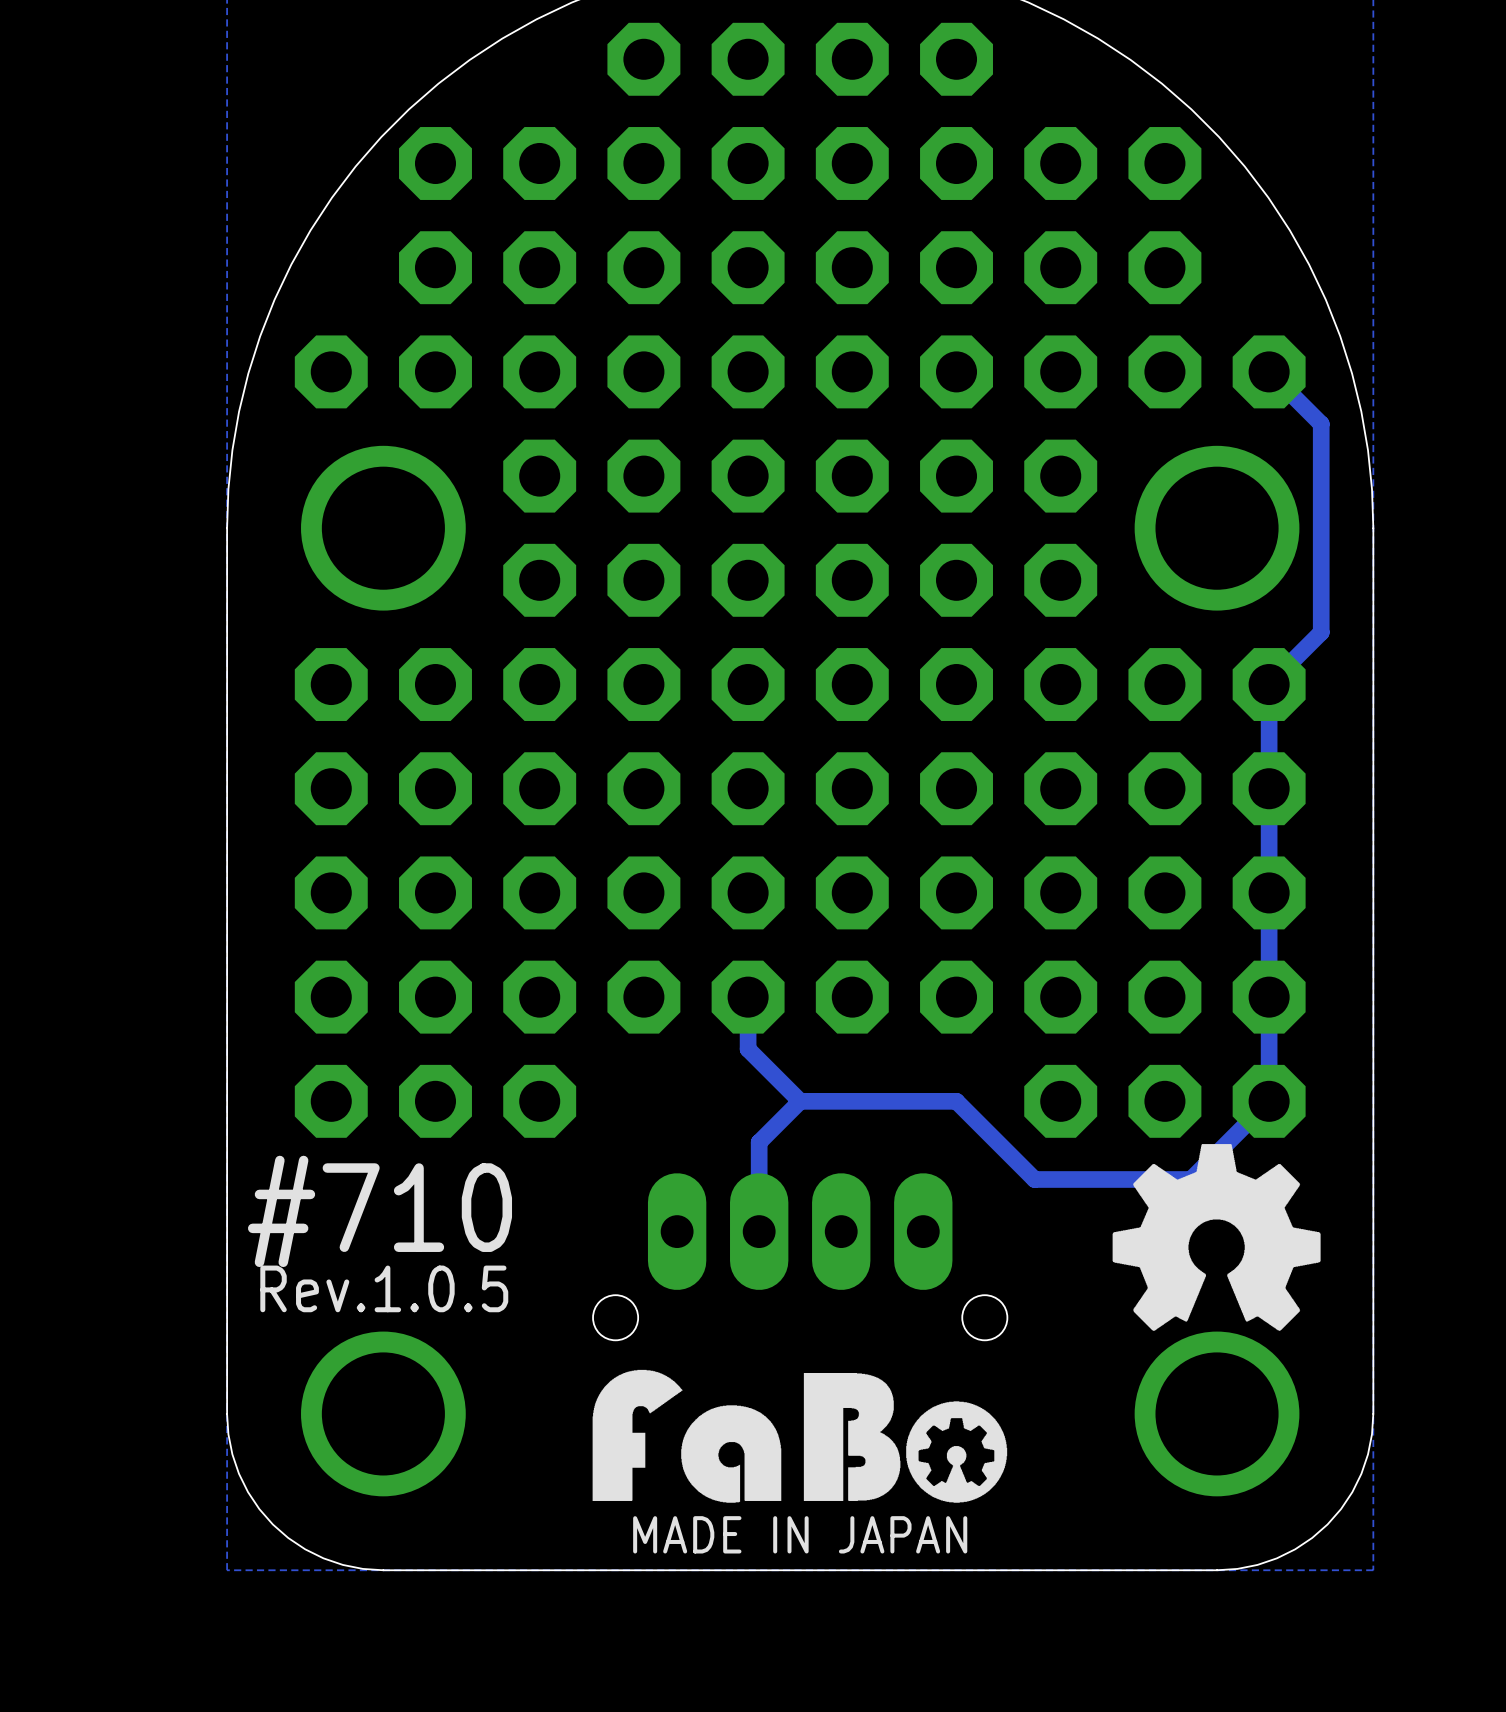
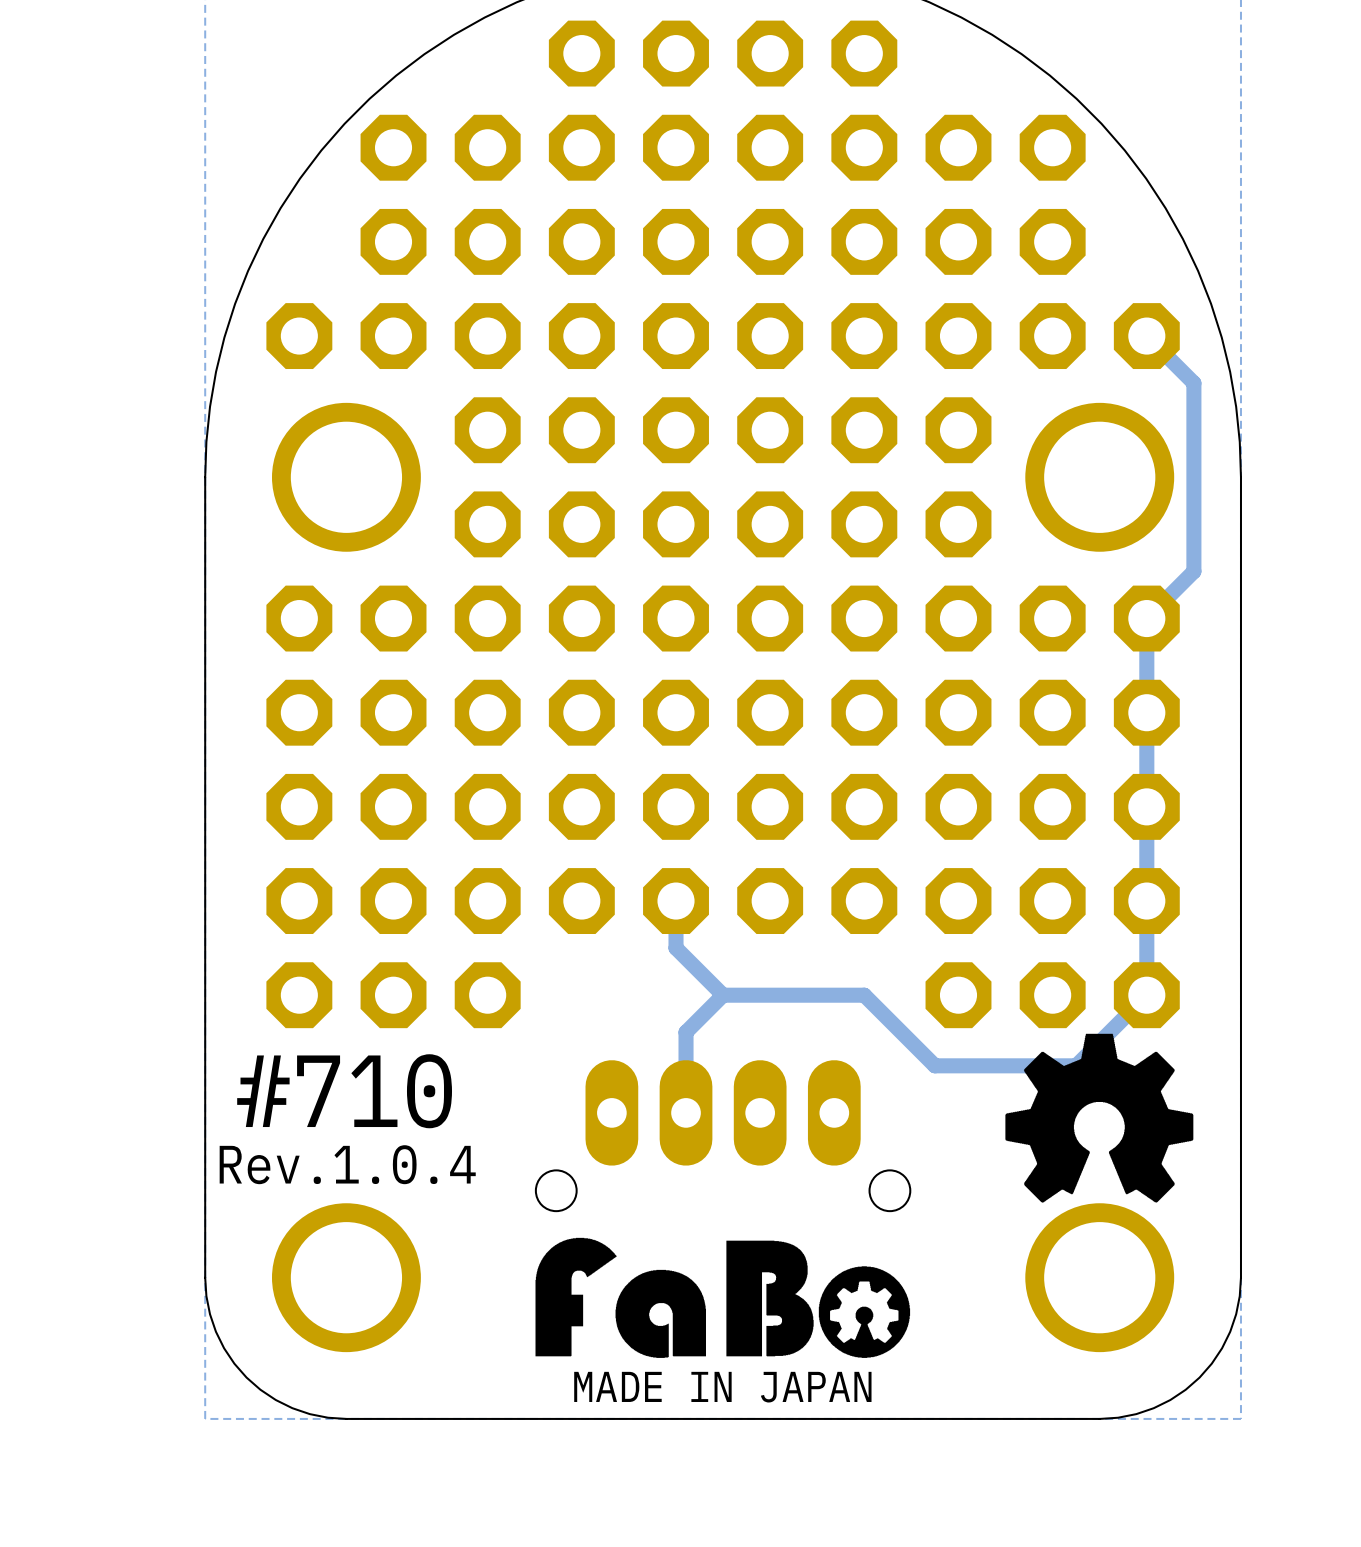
text: Rev.1.0.5 (384, 1288) -> Rev.1.0.4 (347, 1164)

